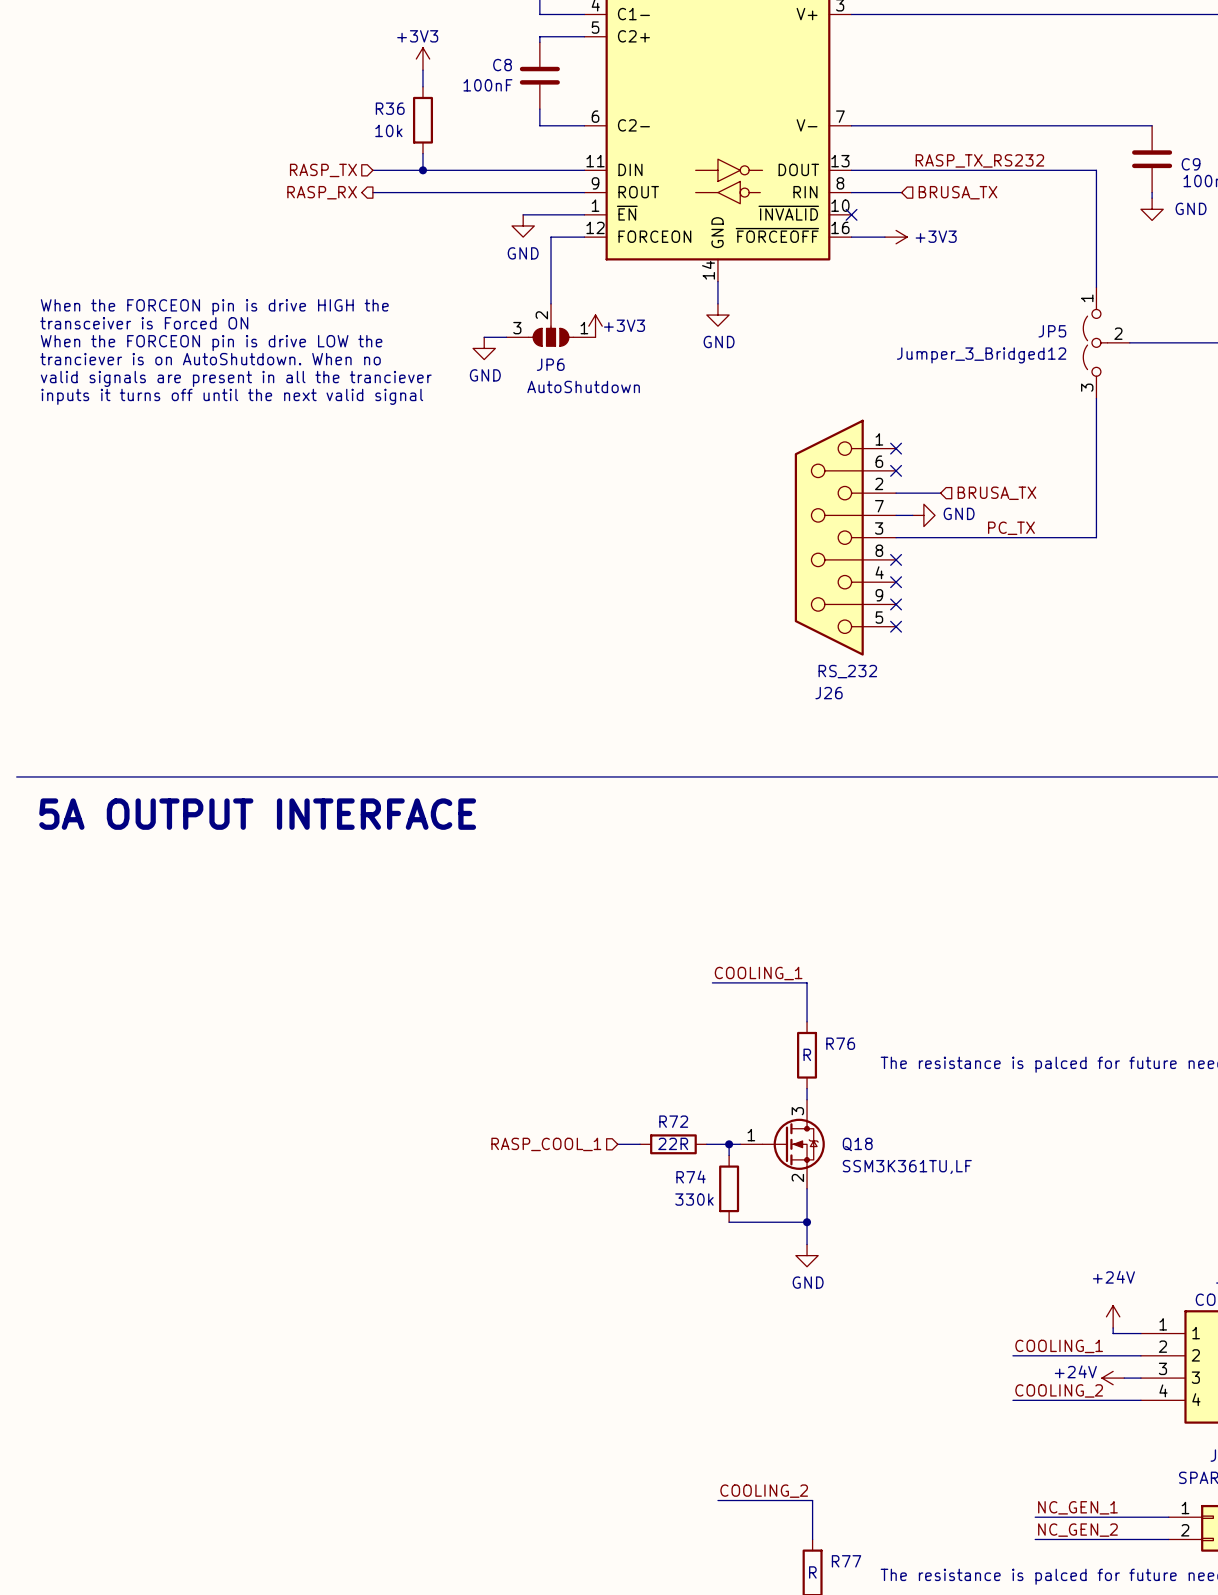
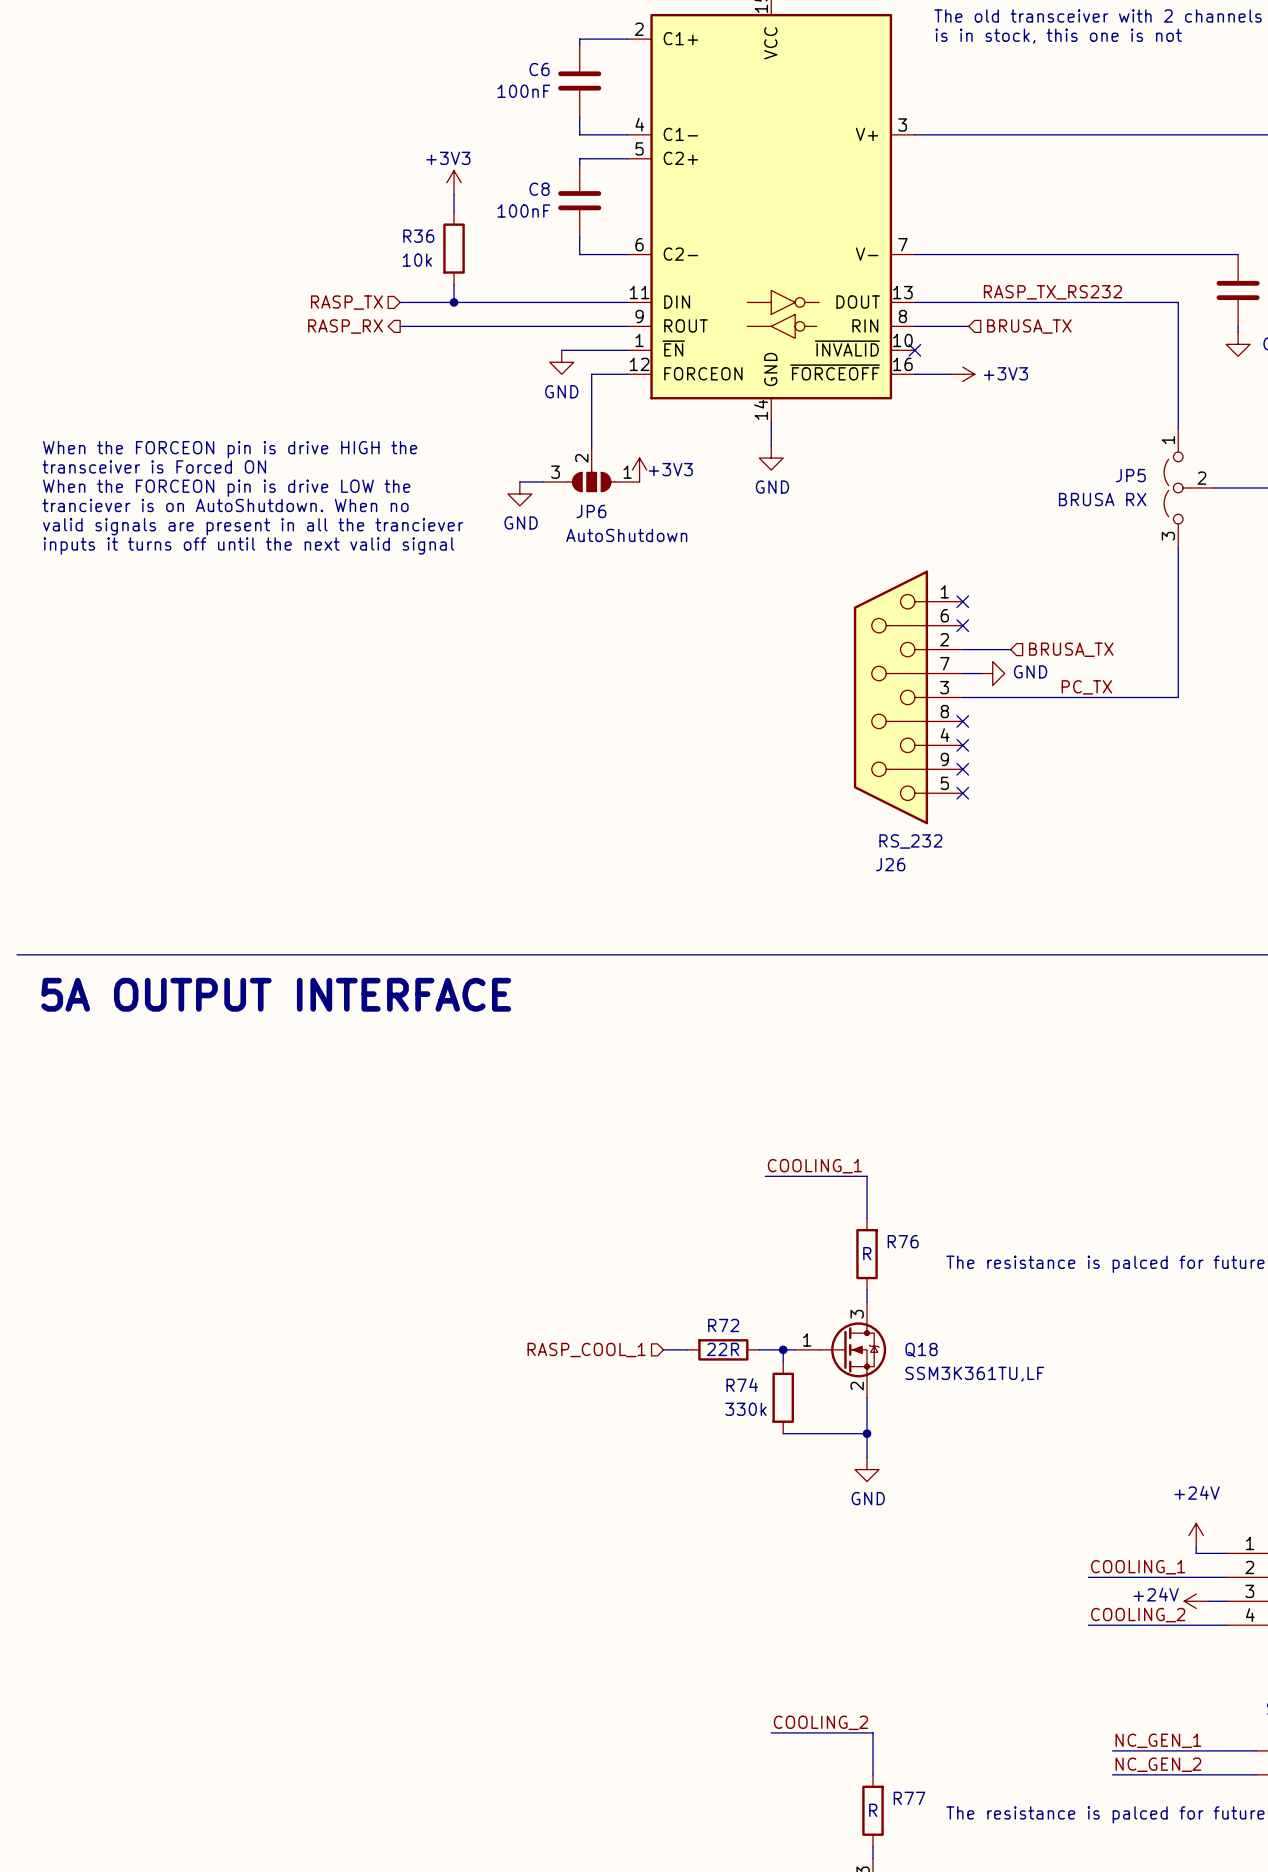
JP5 value: Jumper_3_Bridged12 (981, 355) -> BRUSA RX (1102, 499)

